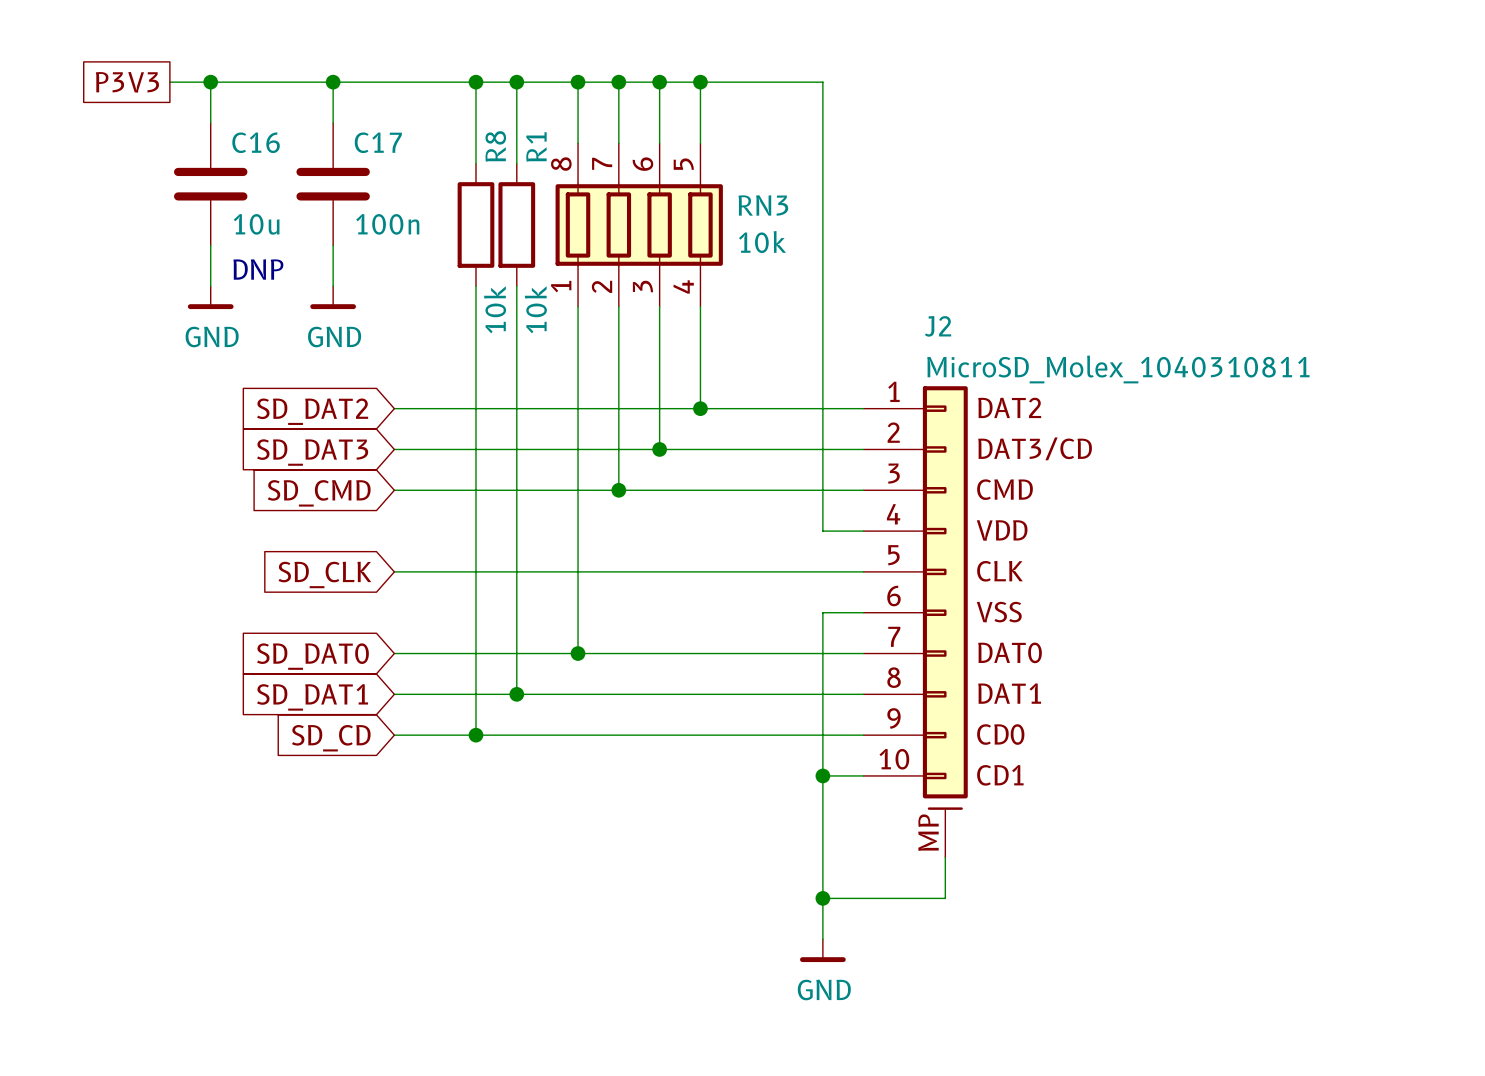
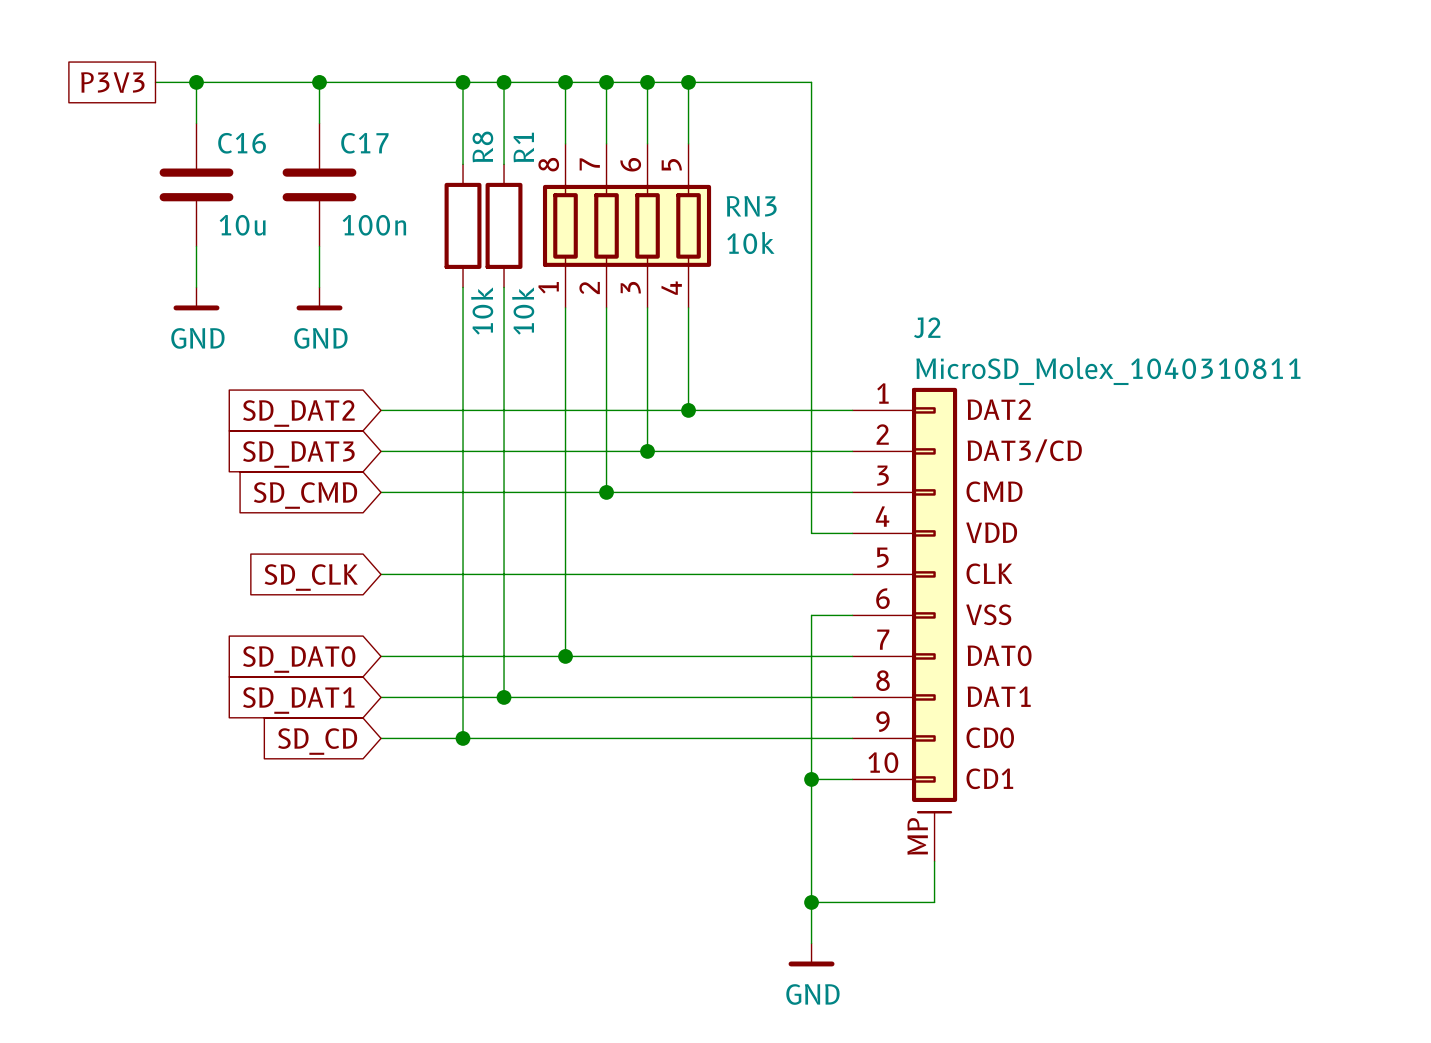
text: DNP (258, 269) -> none

